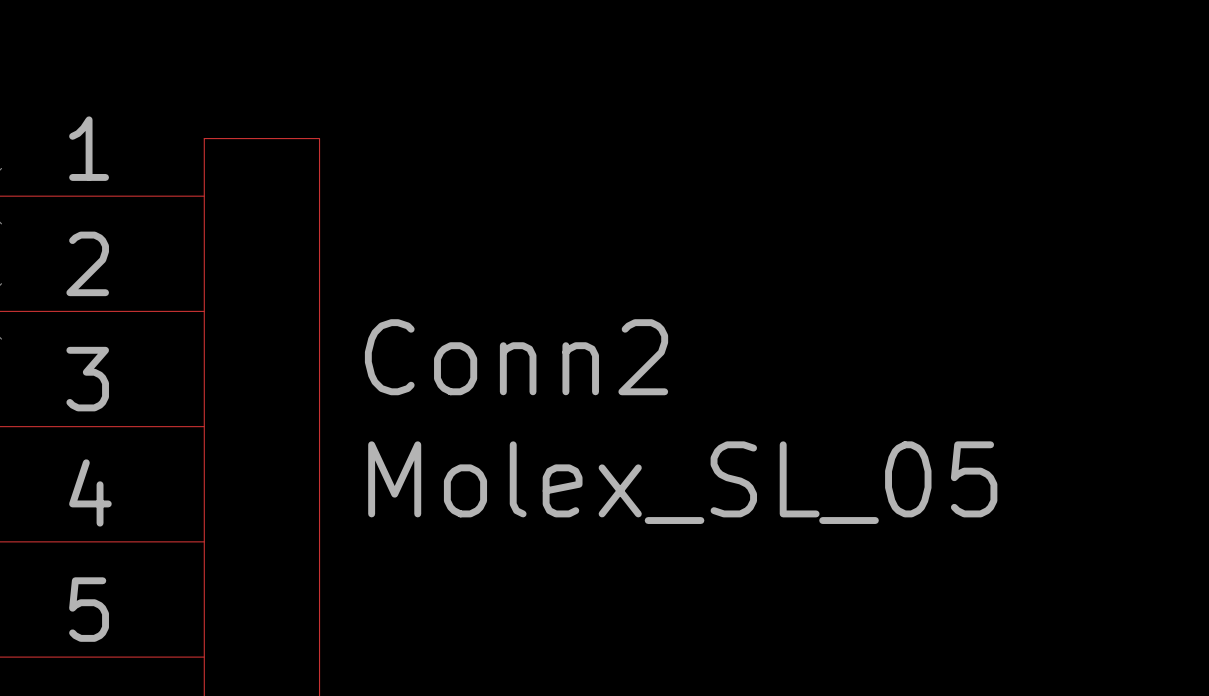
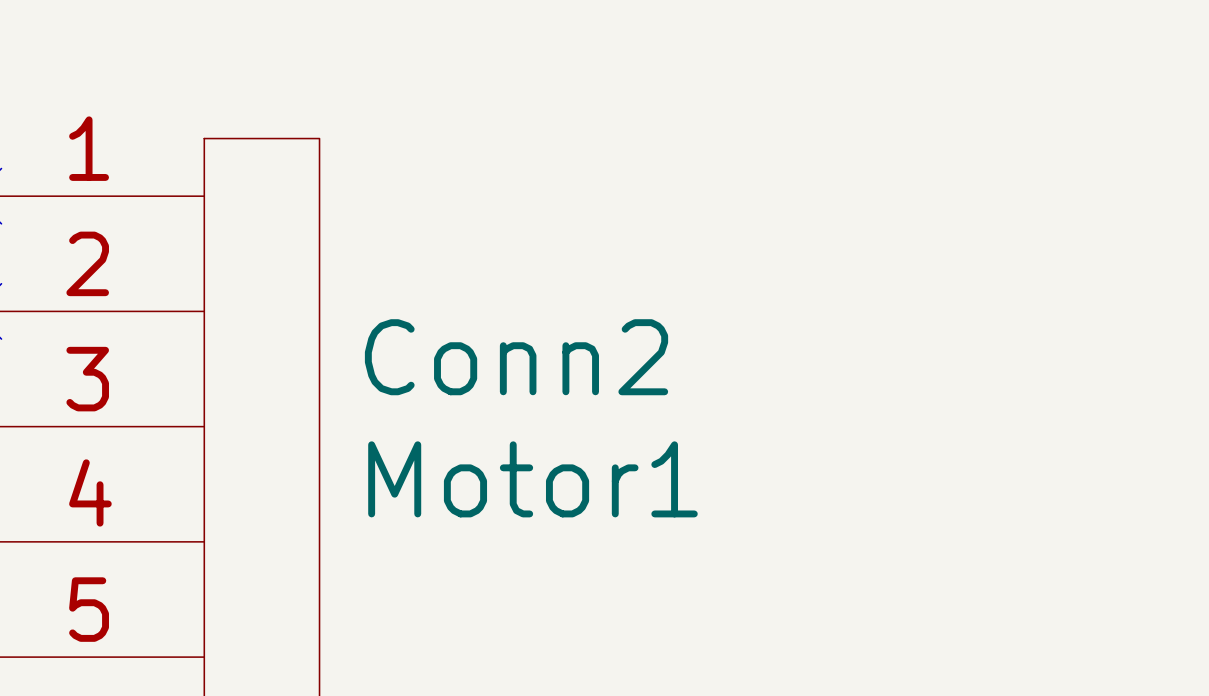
Conn2 value: Molex_SL_05 (682, 482) -> Motor1 (532, 479)

